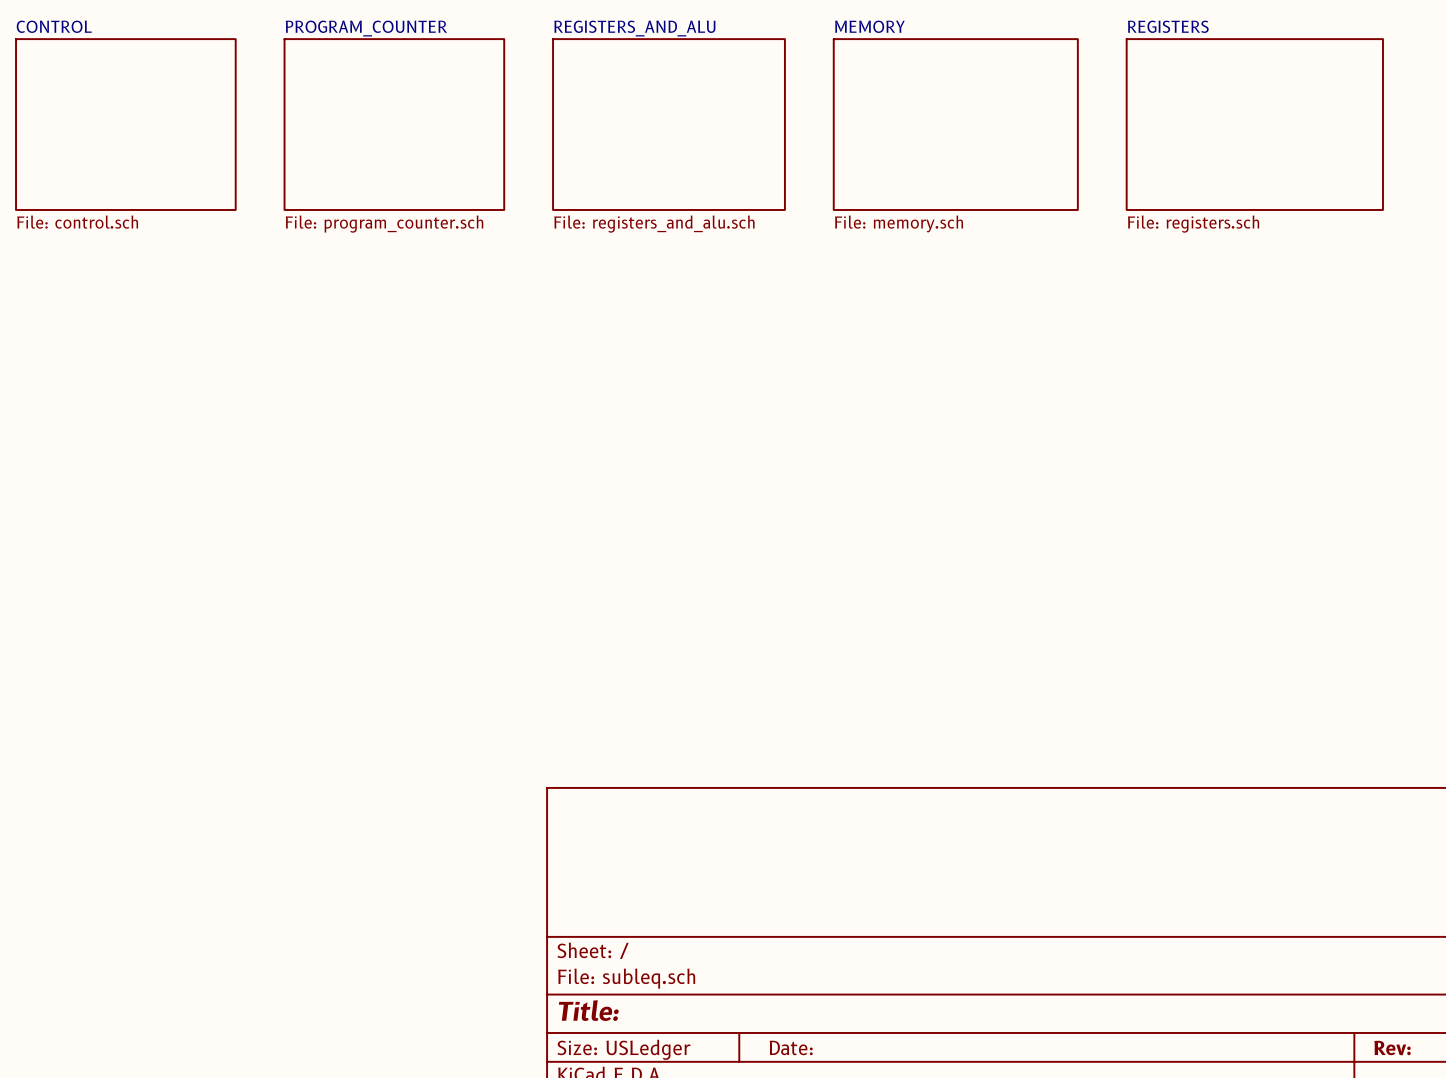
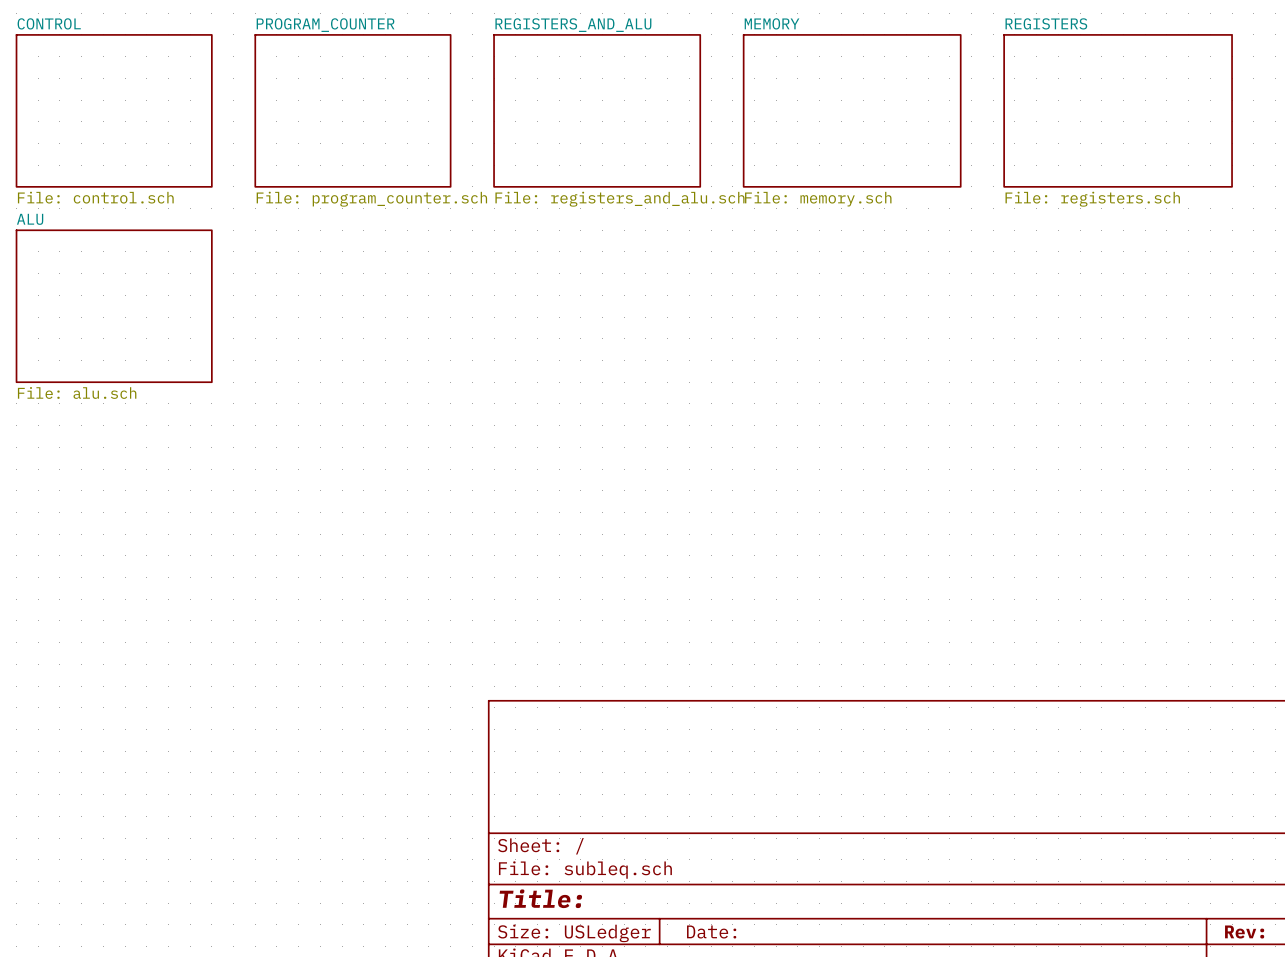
sheet ALU: none -> File: alu.sch (114, 306)

